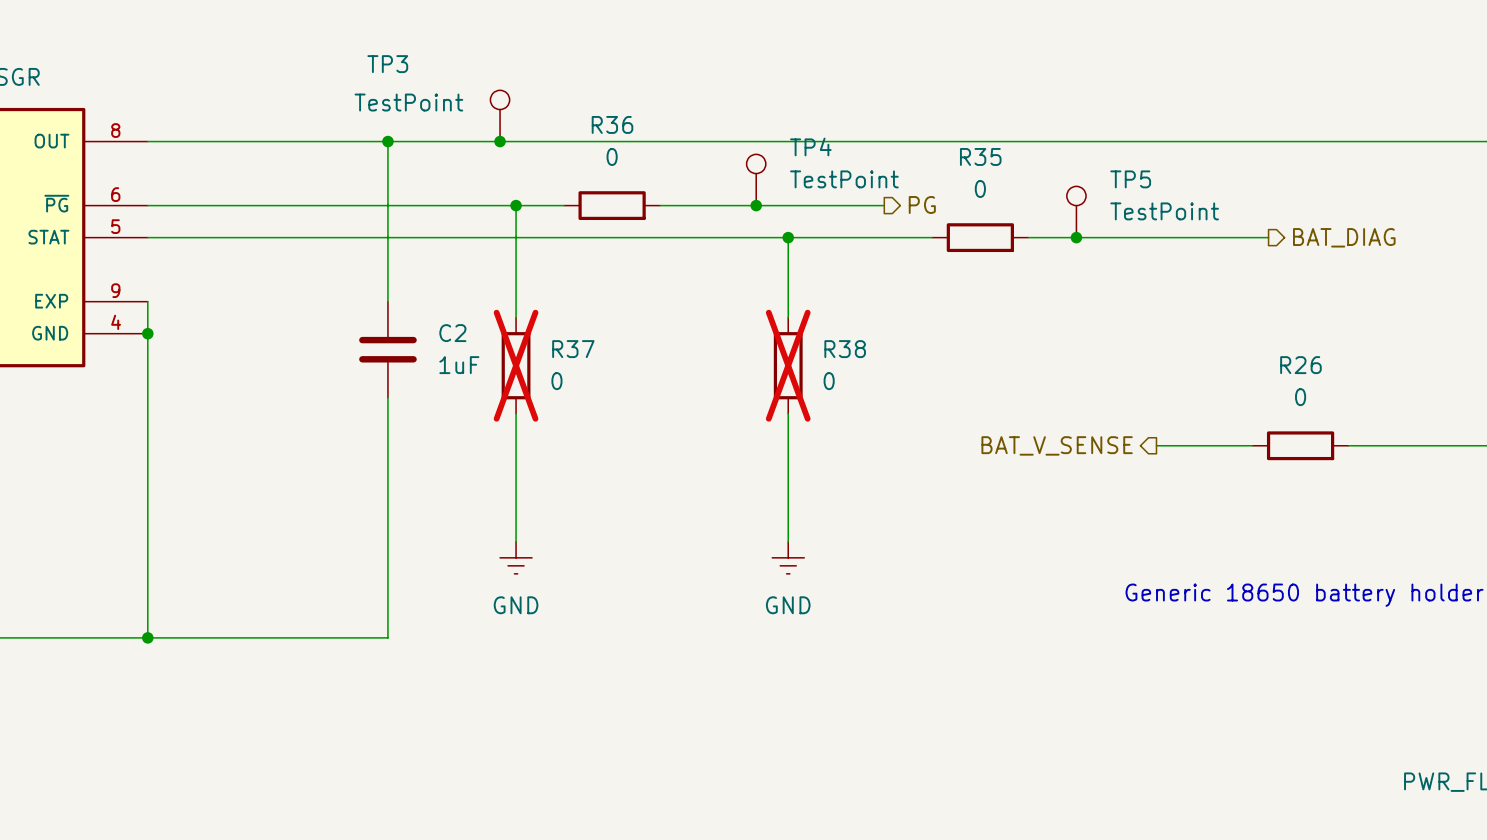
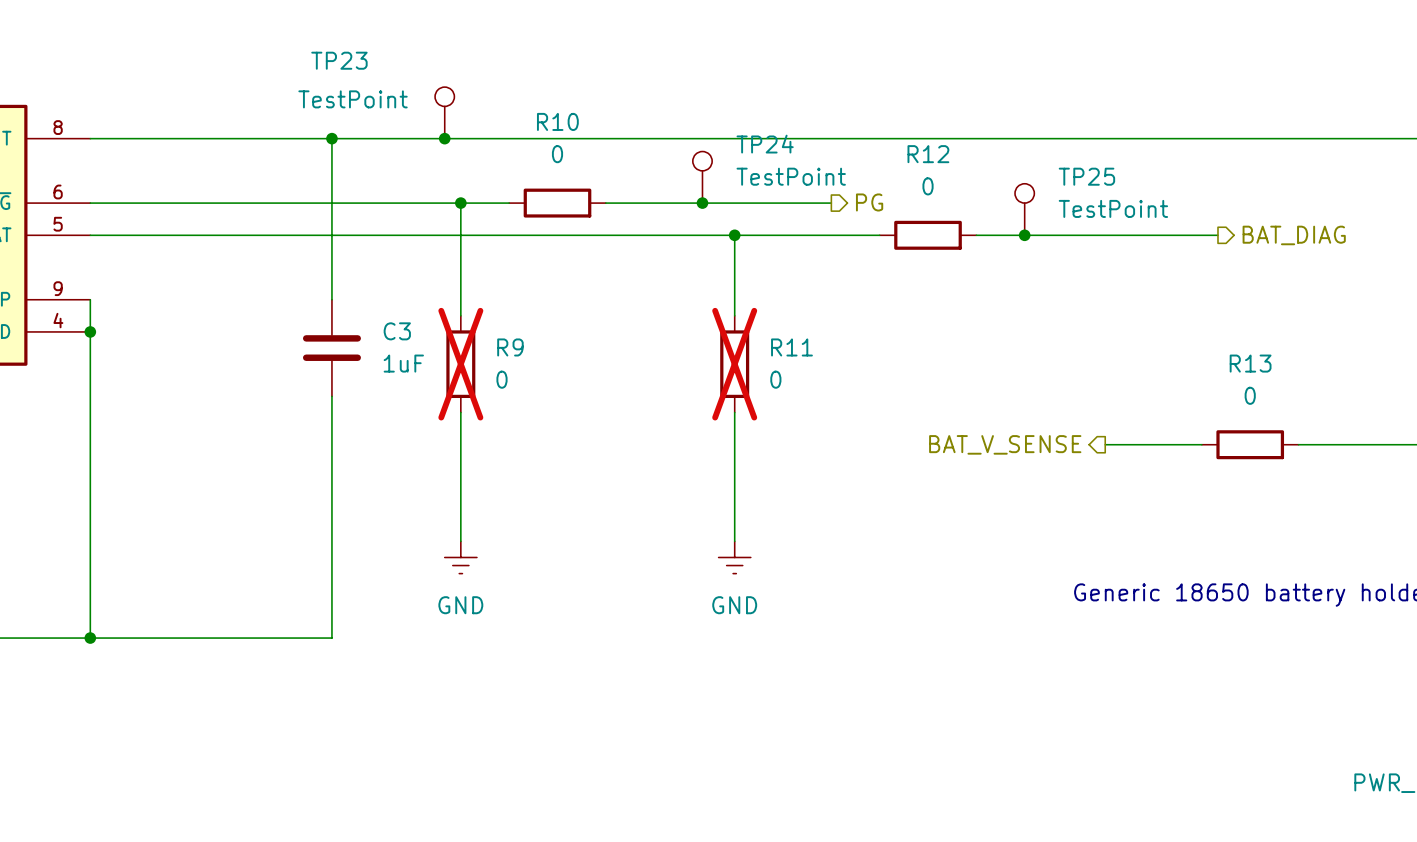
TP3 name: TP3 (387, 64) -> TP23 (339, 60)
R36 name: R36 (612, 124) -> R10 (557, 121)
TP4 name: TP4 (810, 146) -> TP24 (765, 144)
R35 name: R35 (980, 156) -> R12 (928, 154)
TP5 name: TP5 (1130, 179) -> TP25 (1086, 176)
C2 name: C2 (452, 333) -> C3 (397, 331)
R37 name: R37 (573, 349) -> R9 (510, 347)
R38 name: R38 (845, 349) -> R11 (791, 347)
R26 name: R26 (1300, 365) -> R13 (1250, 363)

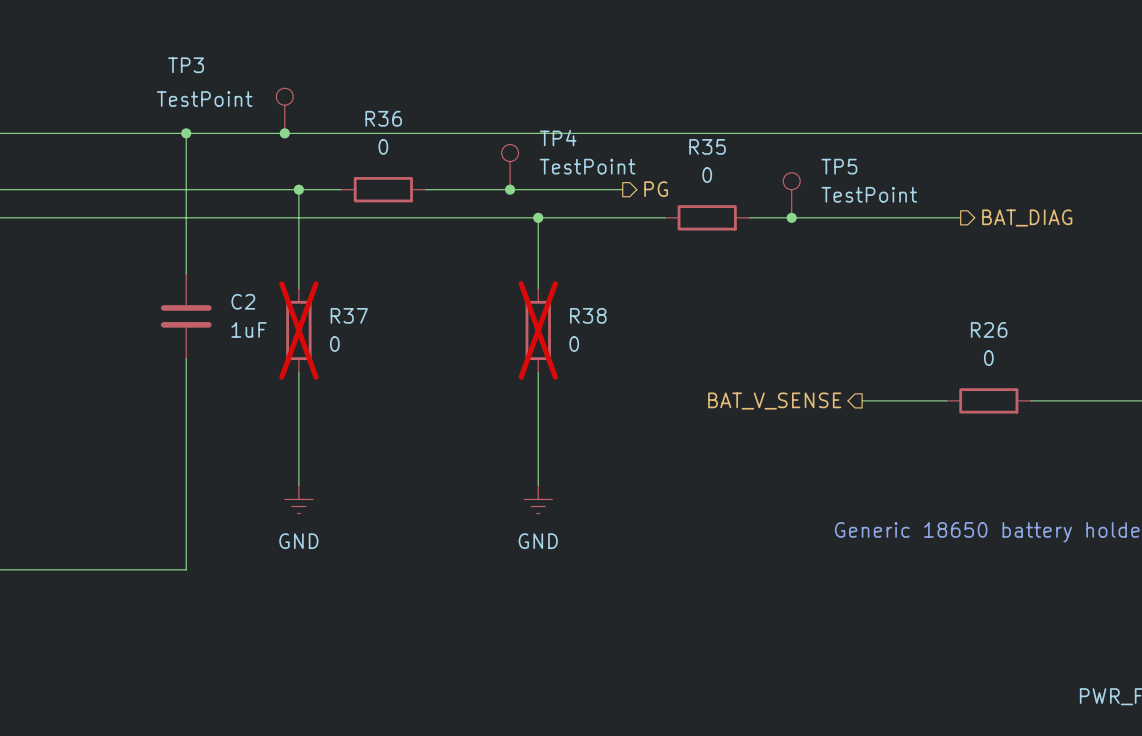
TP23 name: TP23 (339, 60) -> TP3 (186, 65)
R10 name: R10 (557, 121) -> R36 (383, 118)
TP24 name: TP24 (765, 144) -> TP4 (558, 138)
R12 name: R12 (928, 154) -> R35 (707, 146)
TP25 name: TP25 (1086, 176) -> TP5 (839, 166)
C3 name: C3 (397, 331) -> C2 (243, 301)
R9 name: R9 (510, 347) -> R37 (349, 315)
R11 name: R11 (791, 347) -> R38 (588, 315)
R13 name: R13 (1250, 363) -> R26 (989, 329)

